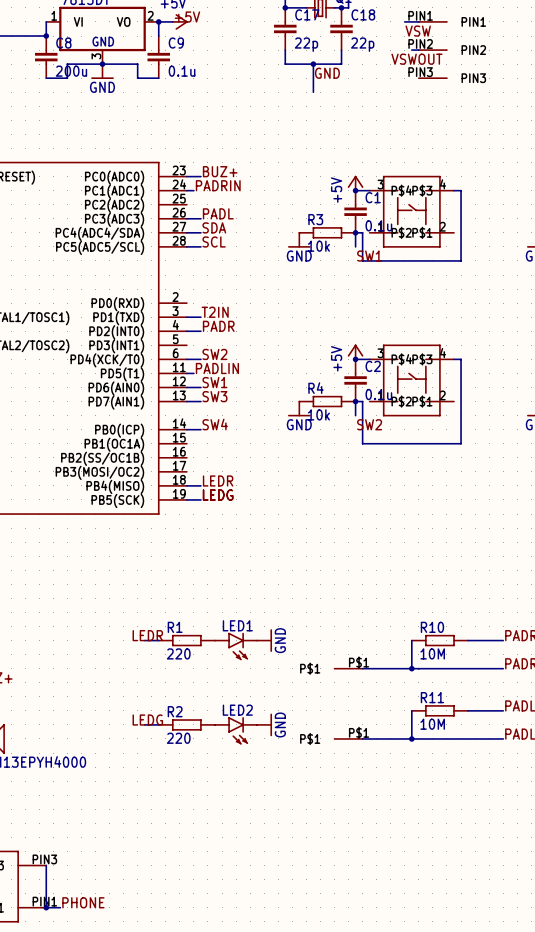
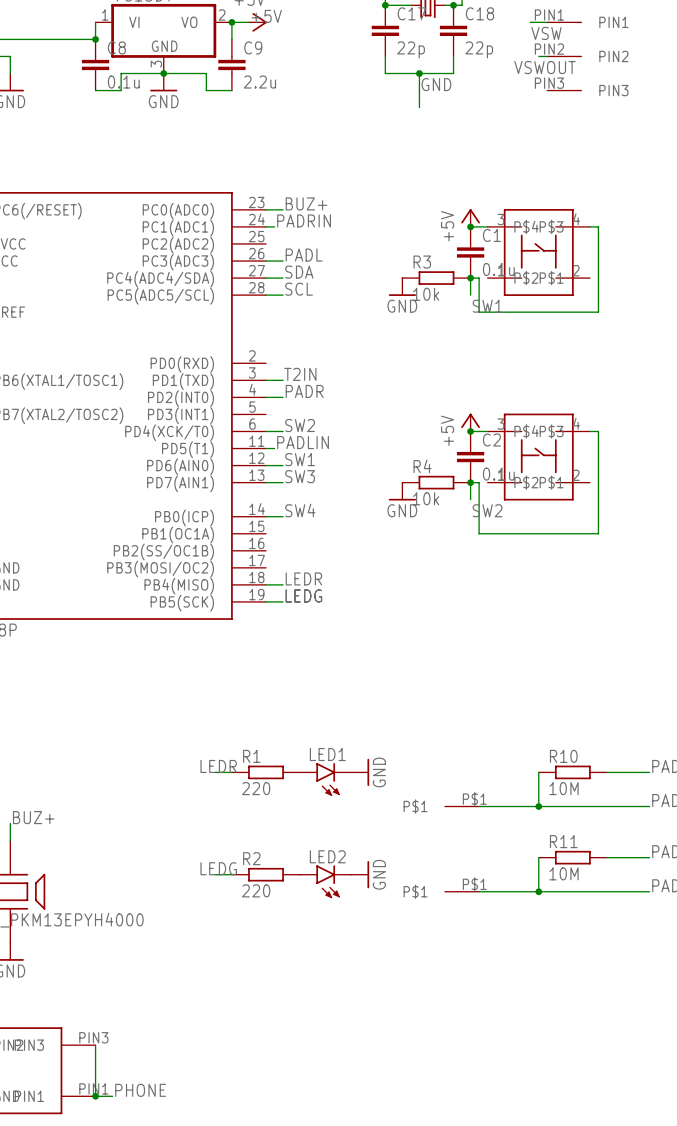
C8 value: 200u (71, 71) -> 0.1u (123, 82)
C9 value: 0.1u (182, 71) -> 2.2u (259, 82)

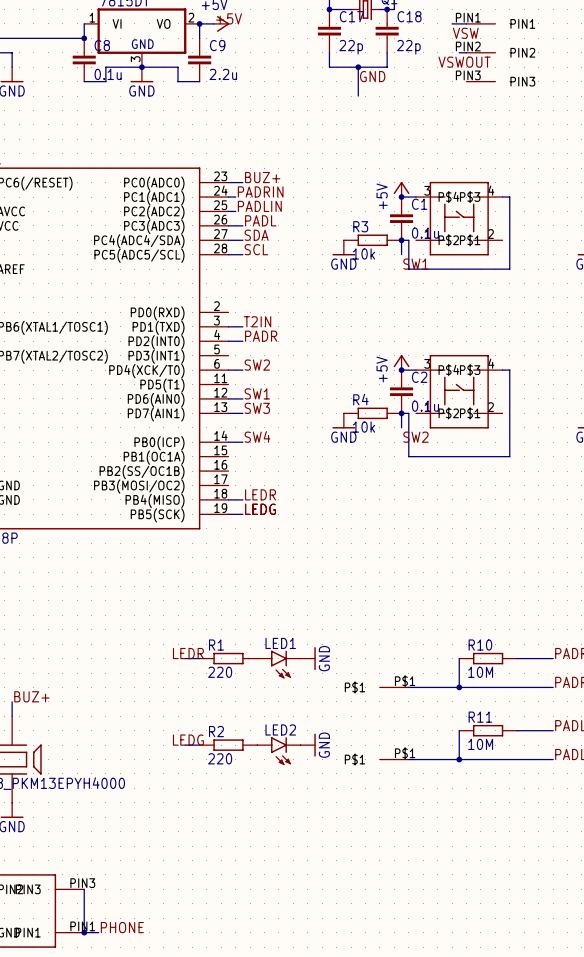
label: none -> PADLIN (259, 206)
wire: none -> (228, 211) (235, 211)
label: PADLIN (303, 442) -> none
wire: (266, 448) (274, 448) -> none

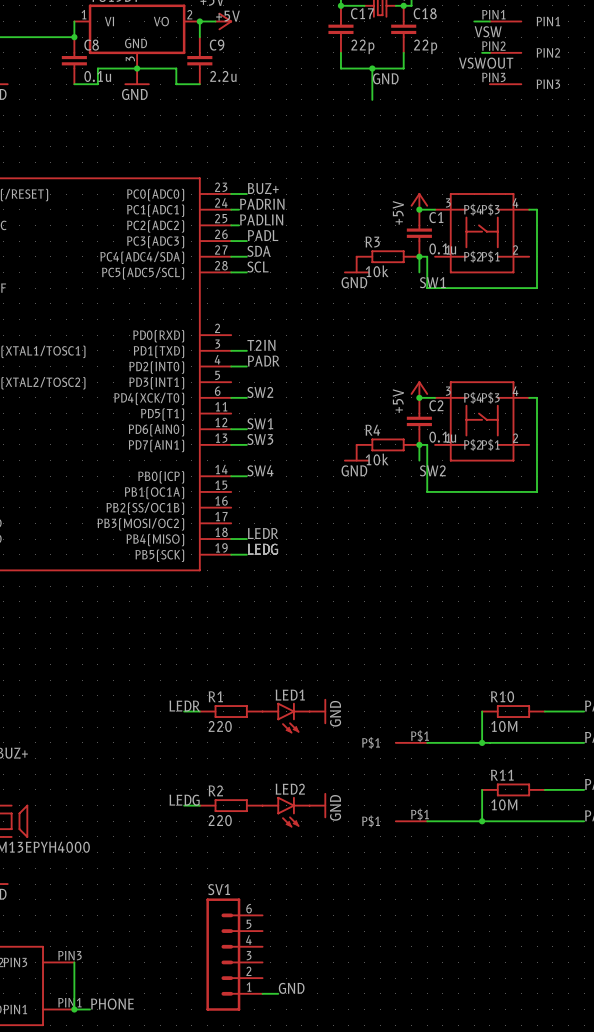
SV1: none -> (234, 954)
label: none -> GND (291, 988)
wire: none -> (262, 993) (278, 993)

